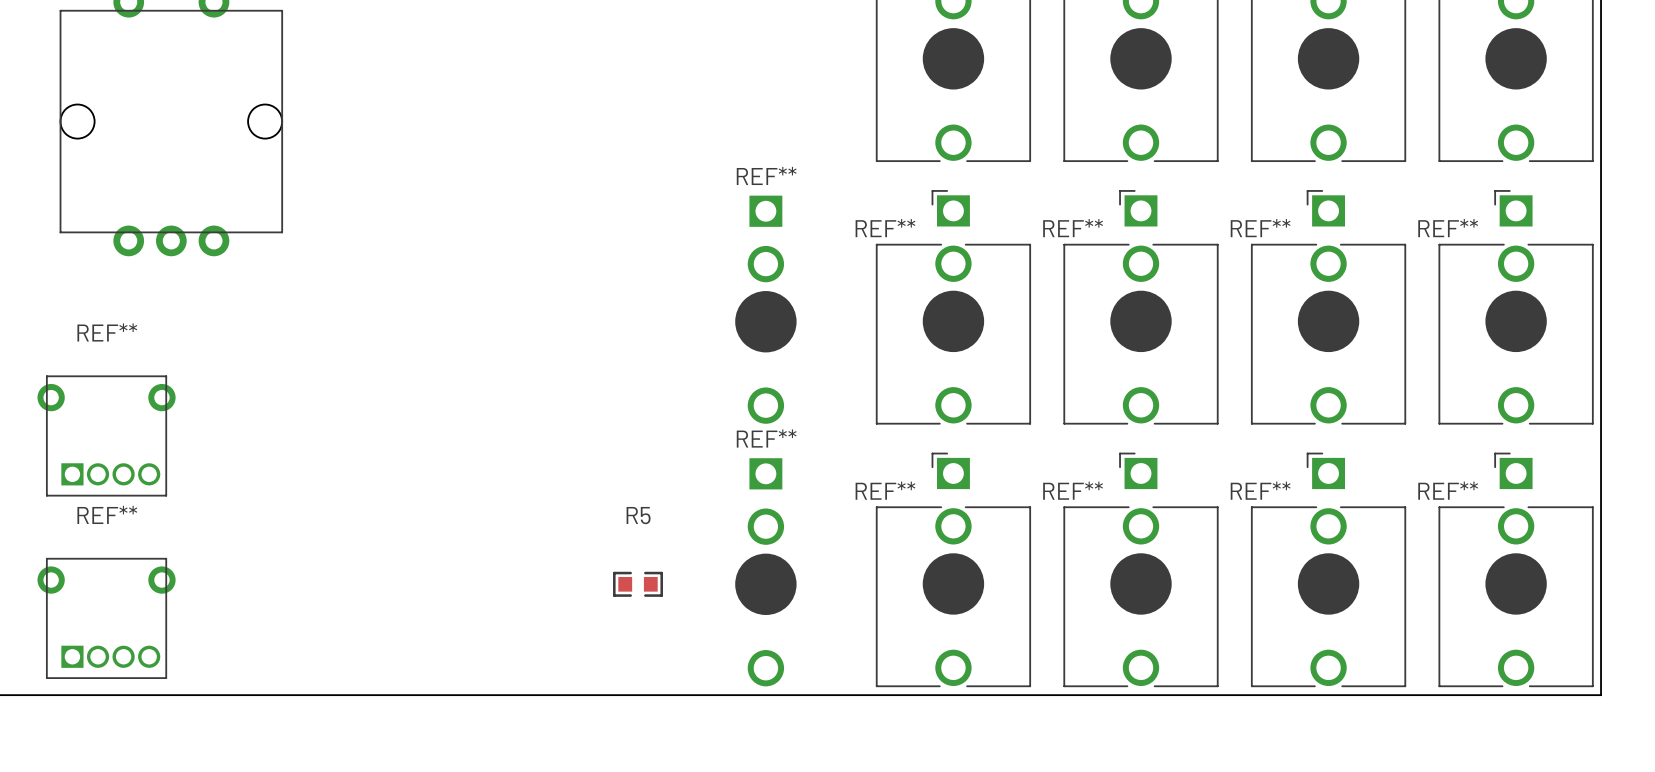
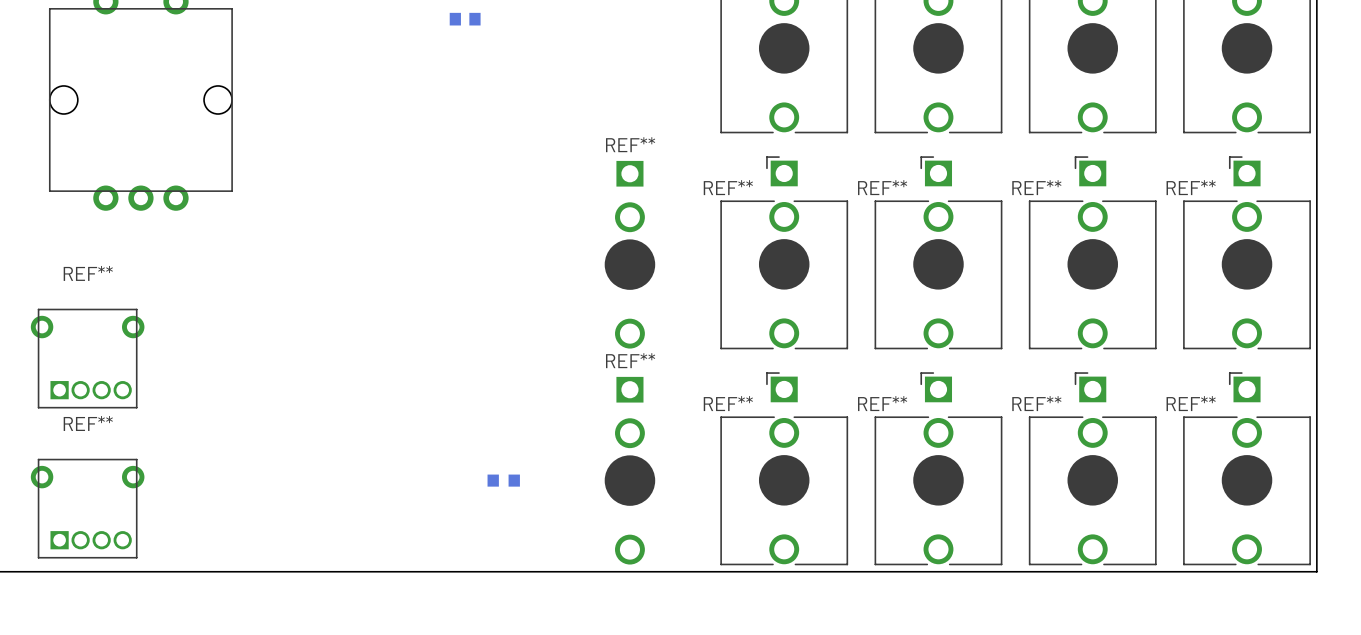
part: none -> (465, 19)
R5 side: top (638, 584) -> bottom (503, 480)

